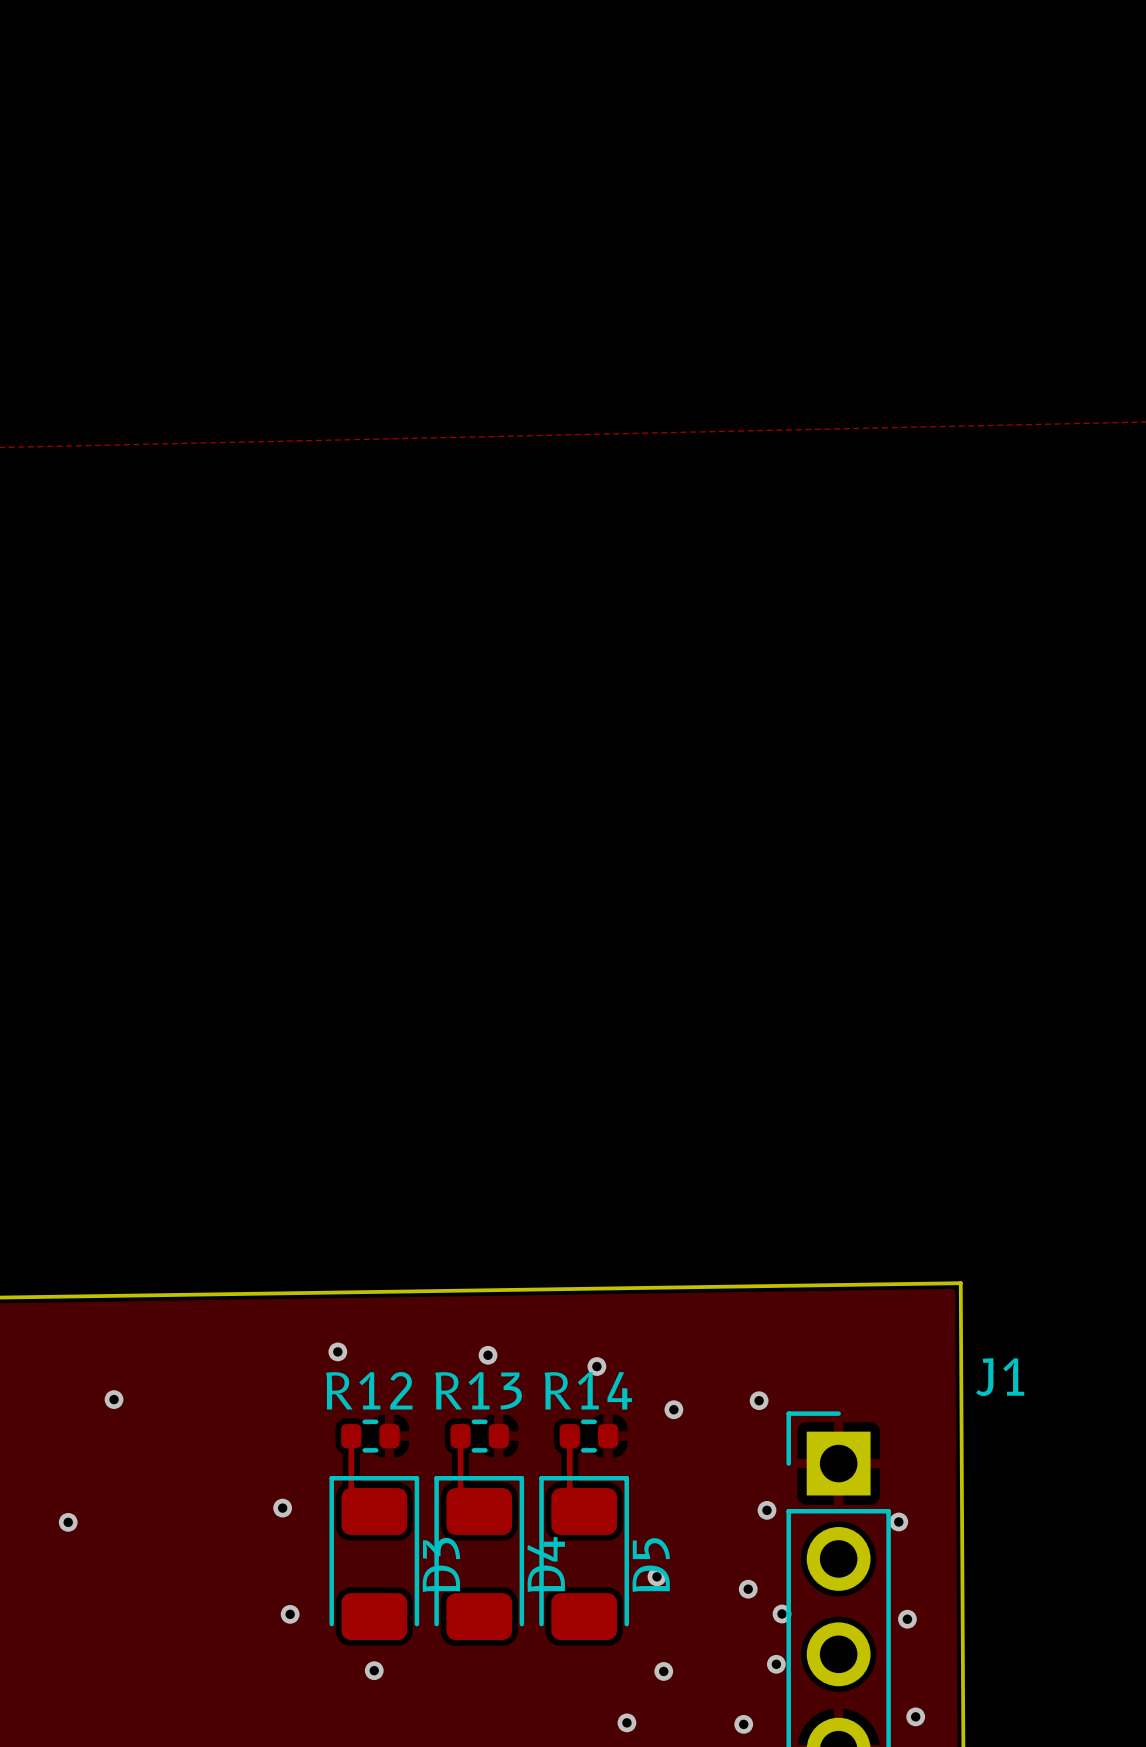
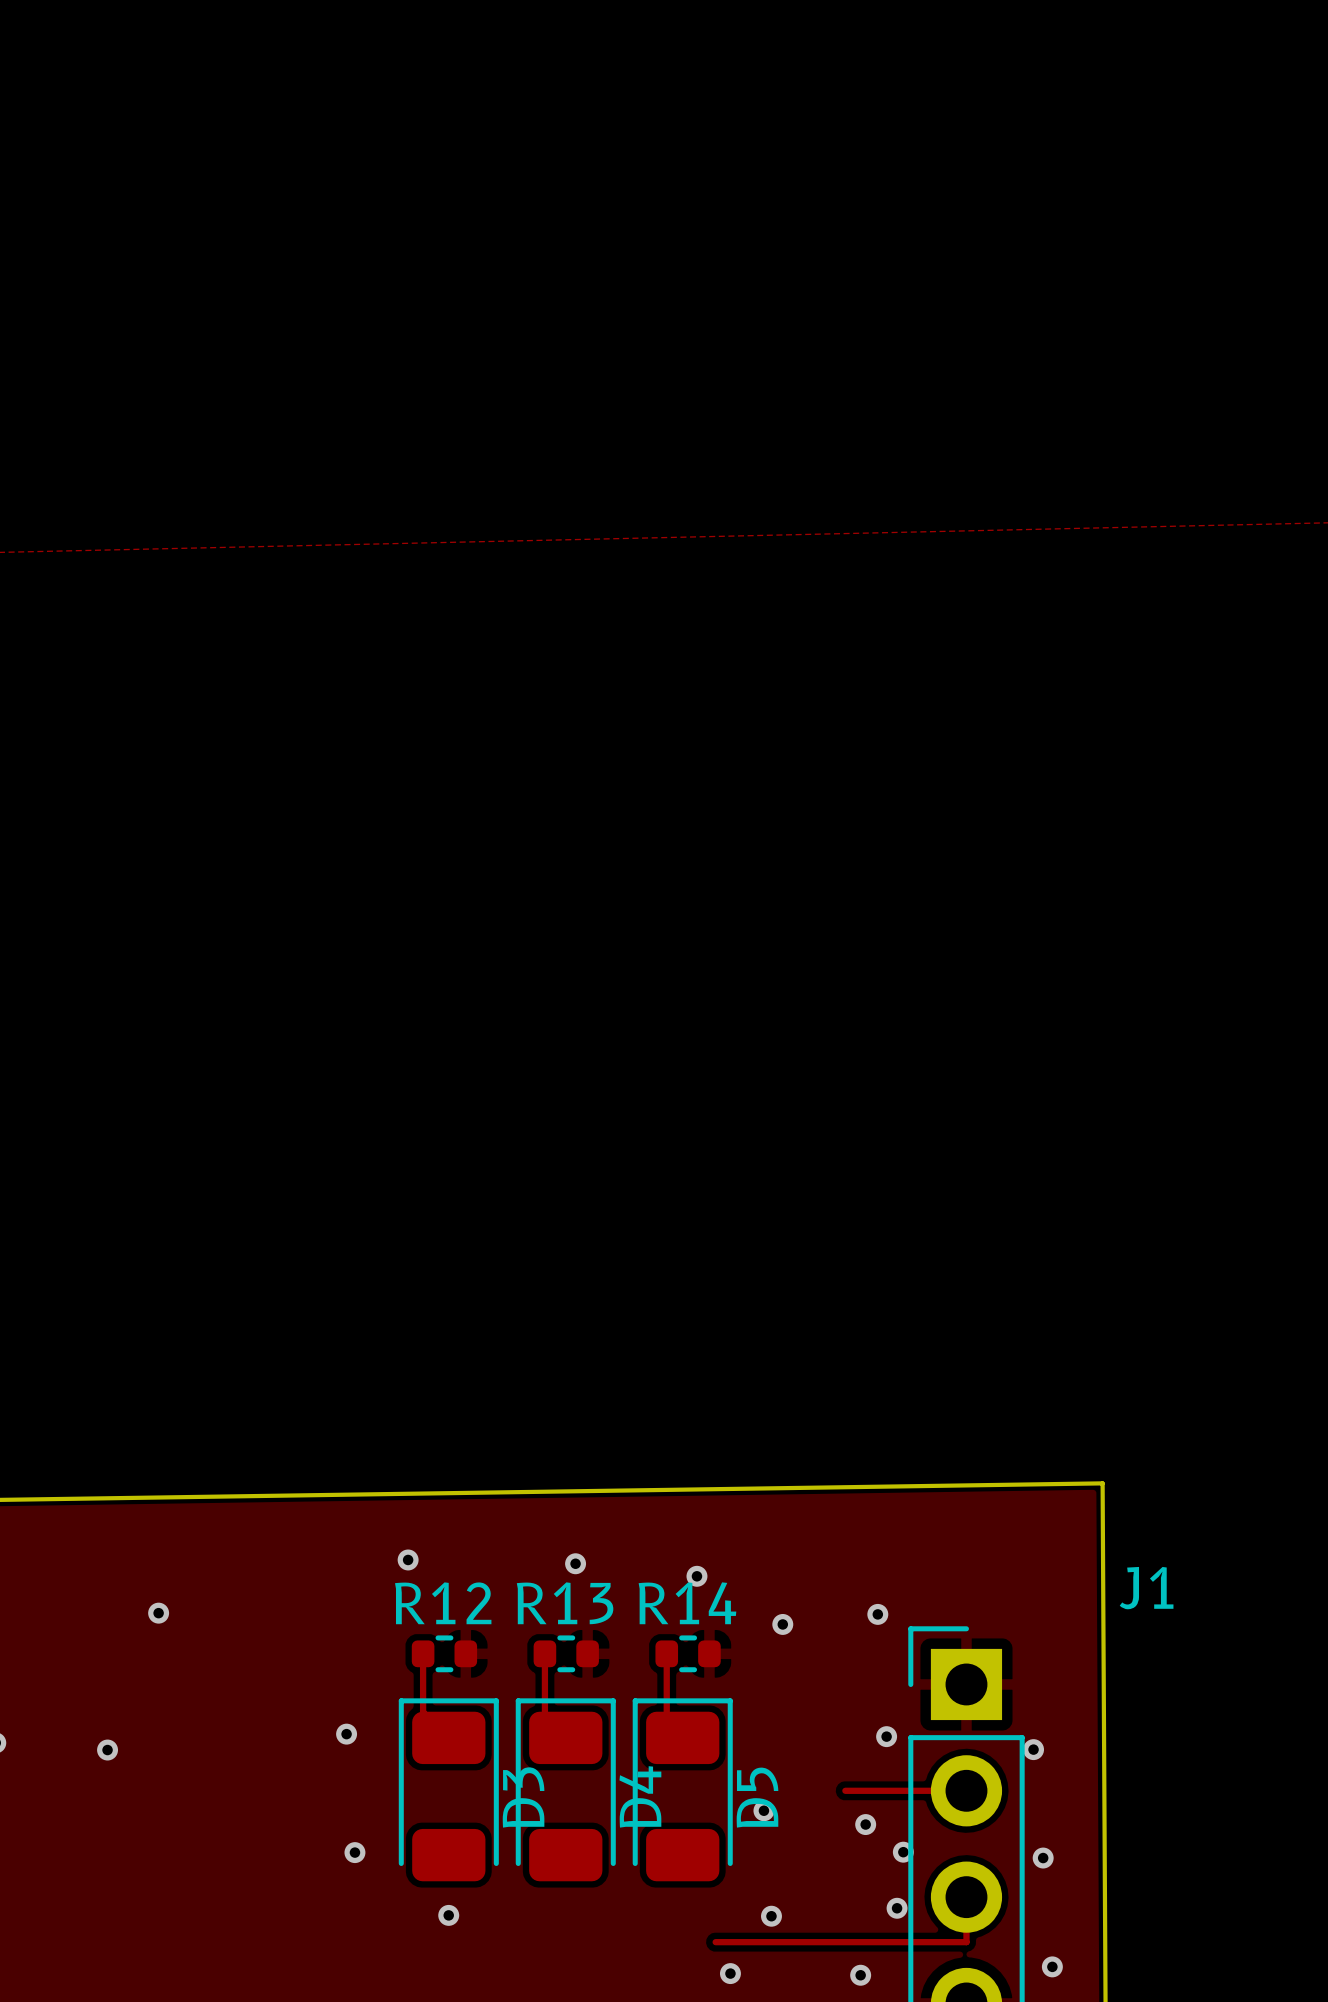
track: none -> (845, 1790) (966, 1790)
track: none -> (966, 1897) (966, 1942) (715, 1942)

